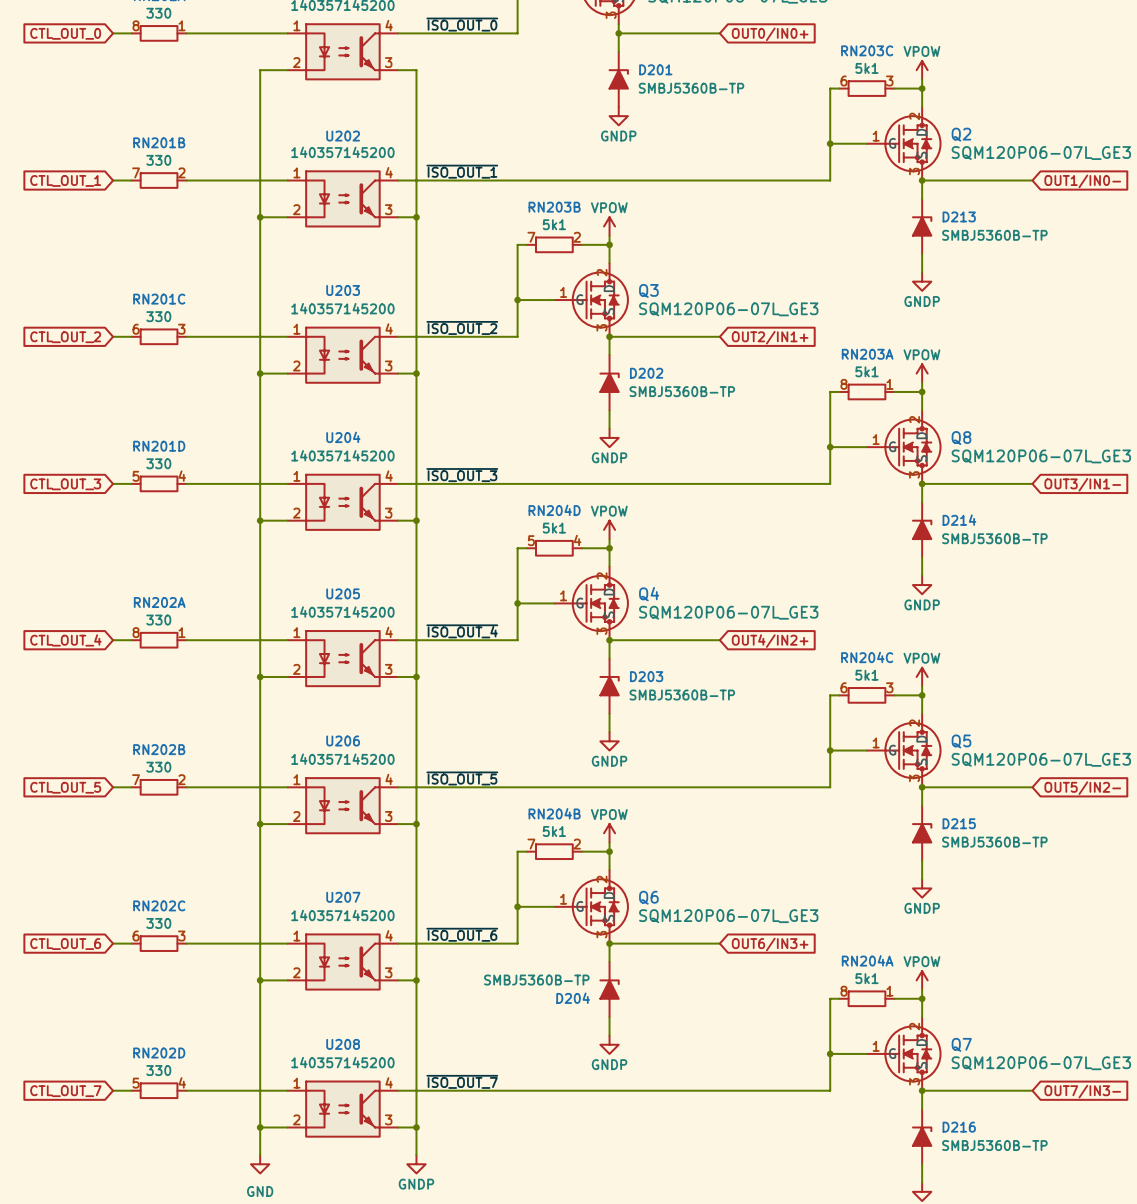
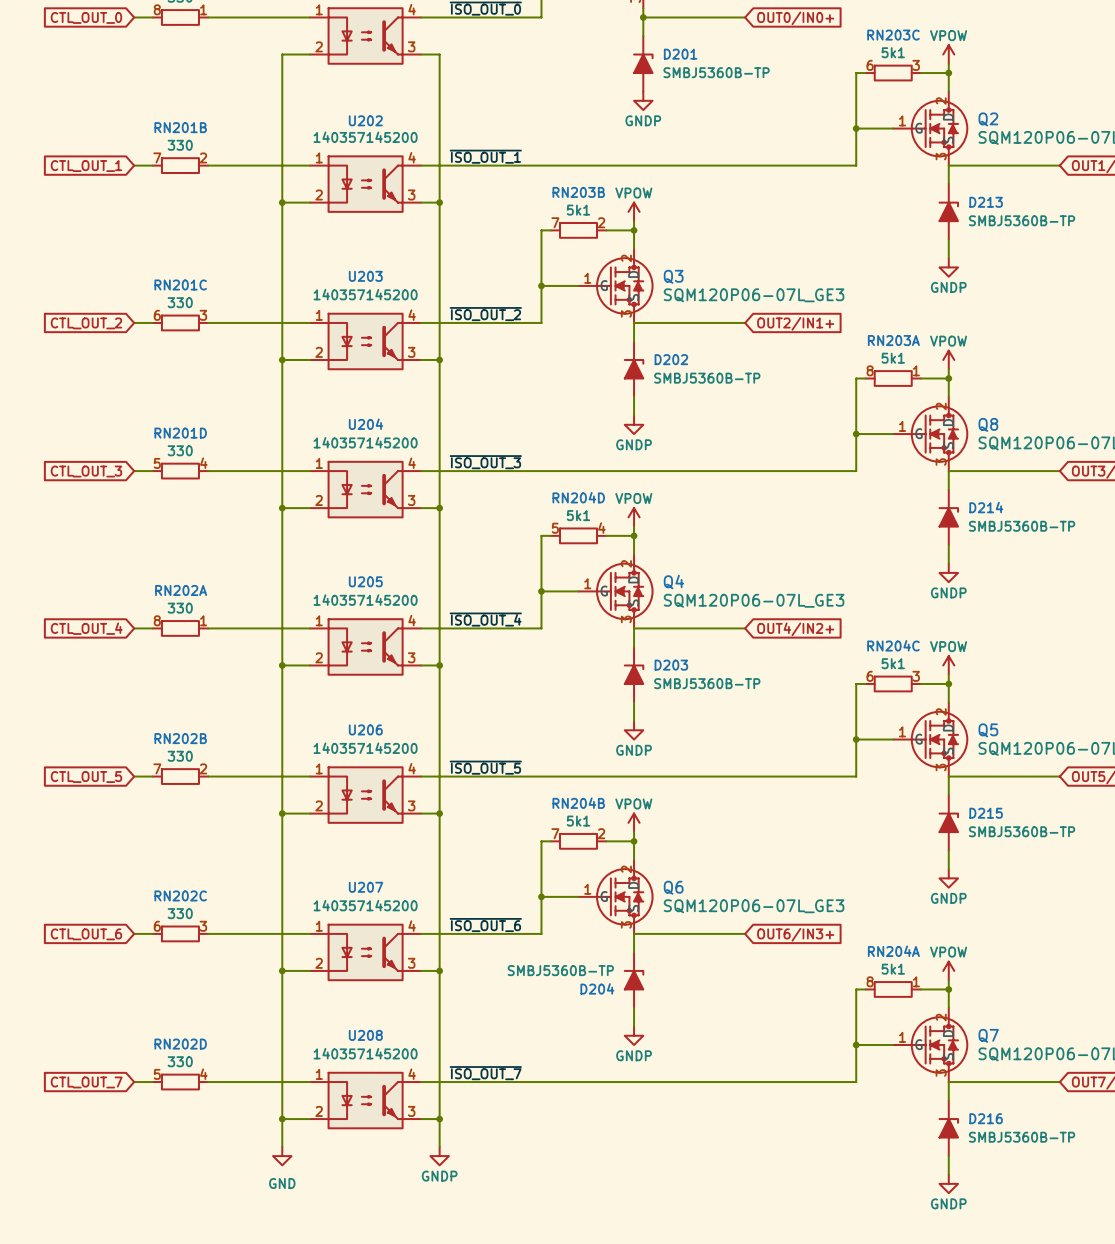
junction: (922, 180) -> none
junction: (609, 336) -> none
junction: (922, 483) -> none
junction: (609, 640) -> none
junction: (922, 787) -> none
junction: (609, 943) -> none
junction: (922, 1090) -> none

